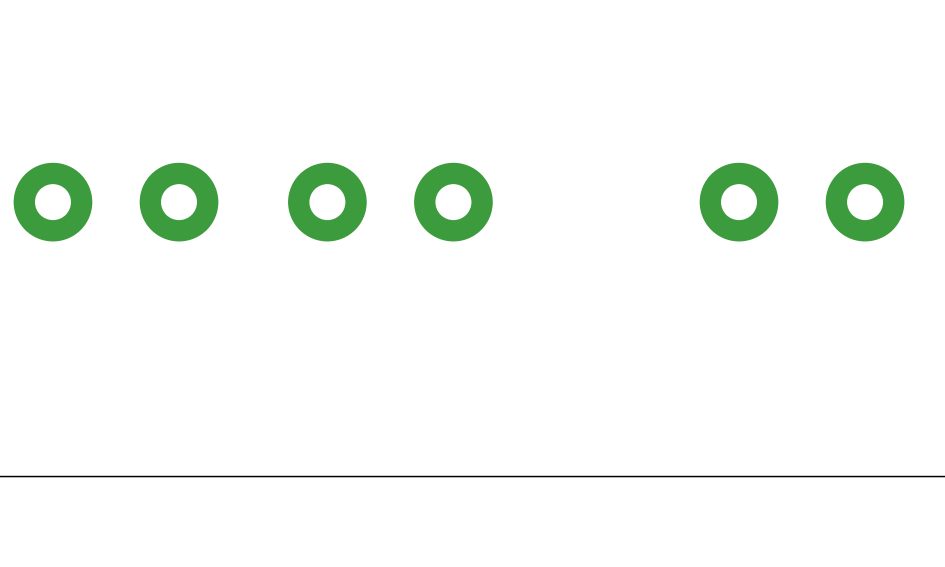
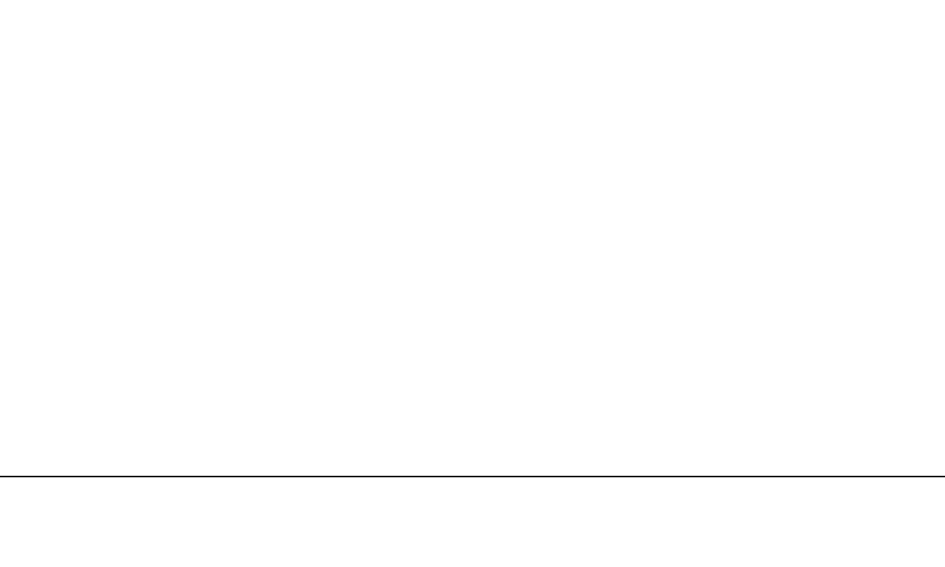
part: (115, 202) -> none
part: (390, 202) -> none
part: (802, 202) -> none

